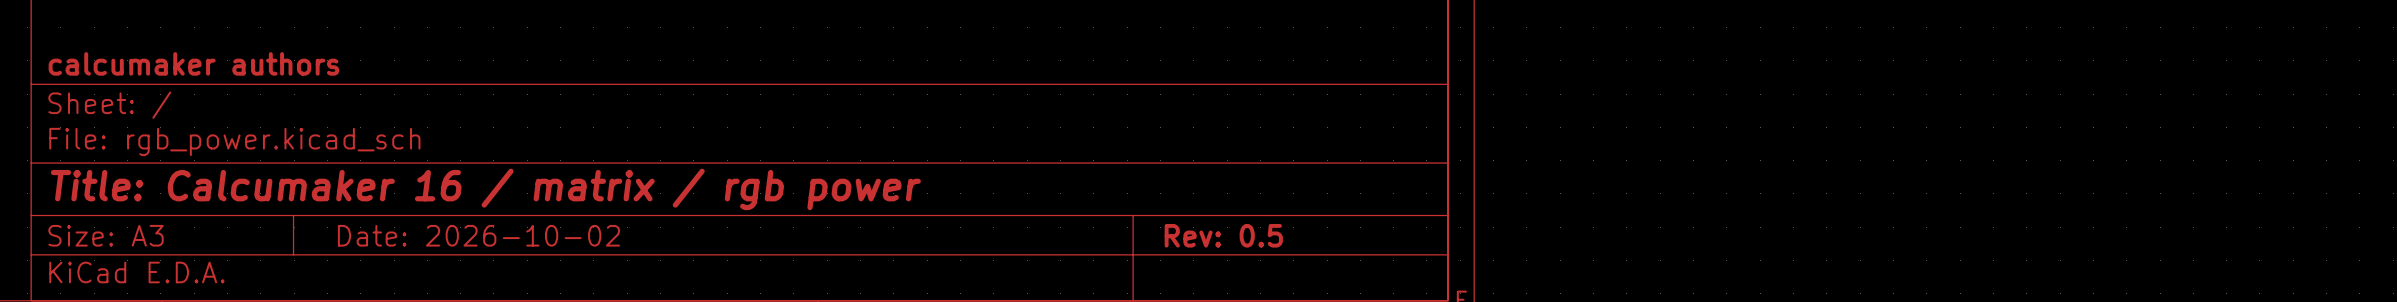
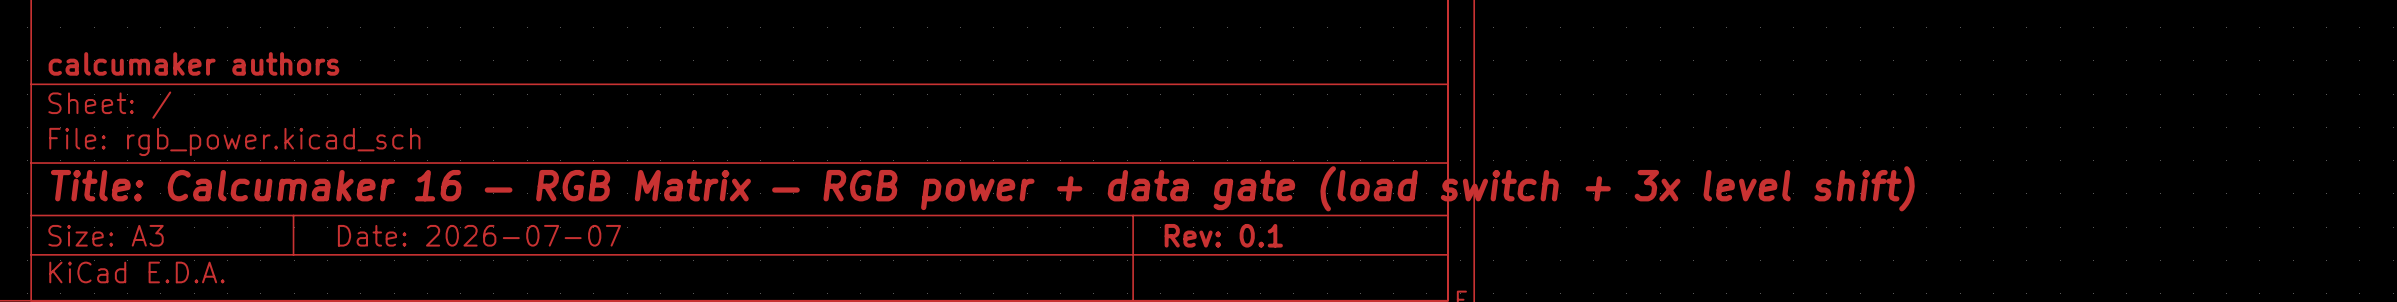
title block: Title: Calcumaker 16 / matrix / rgb power (485, 189) -> Title: Calcumaker 16 — RGB Matrix — RGB power + data gate (load switch + 3x level shift) (982, 188)
title block: Date: 2026-10-02 (478, 235) -> Date: 2026-07-07 (479, 235)
title block: Rev: 0.5 (1223, 235) -> Rev: 0.1 (1223, 235)

